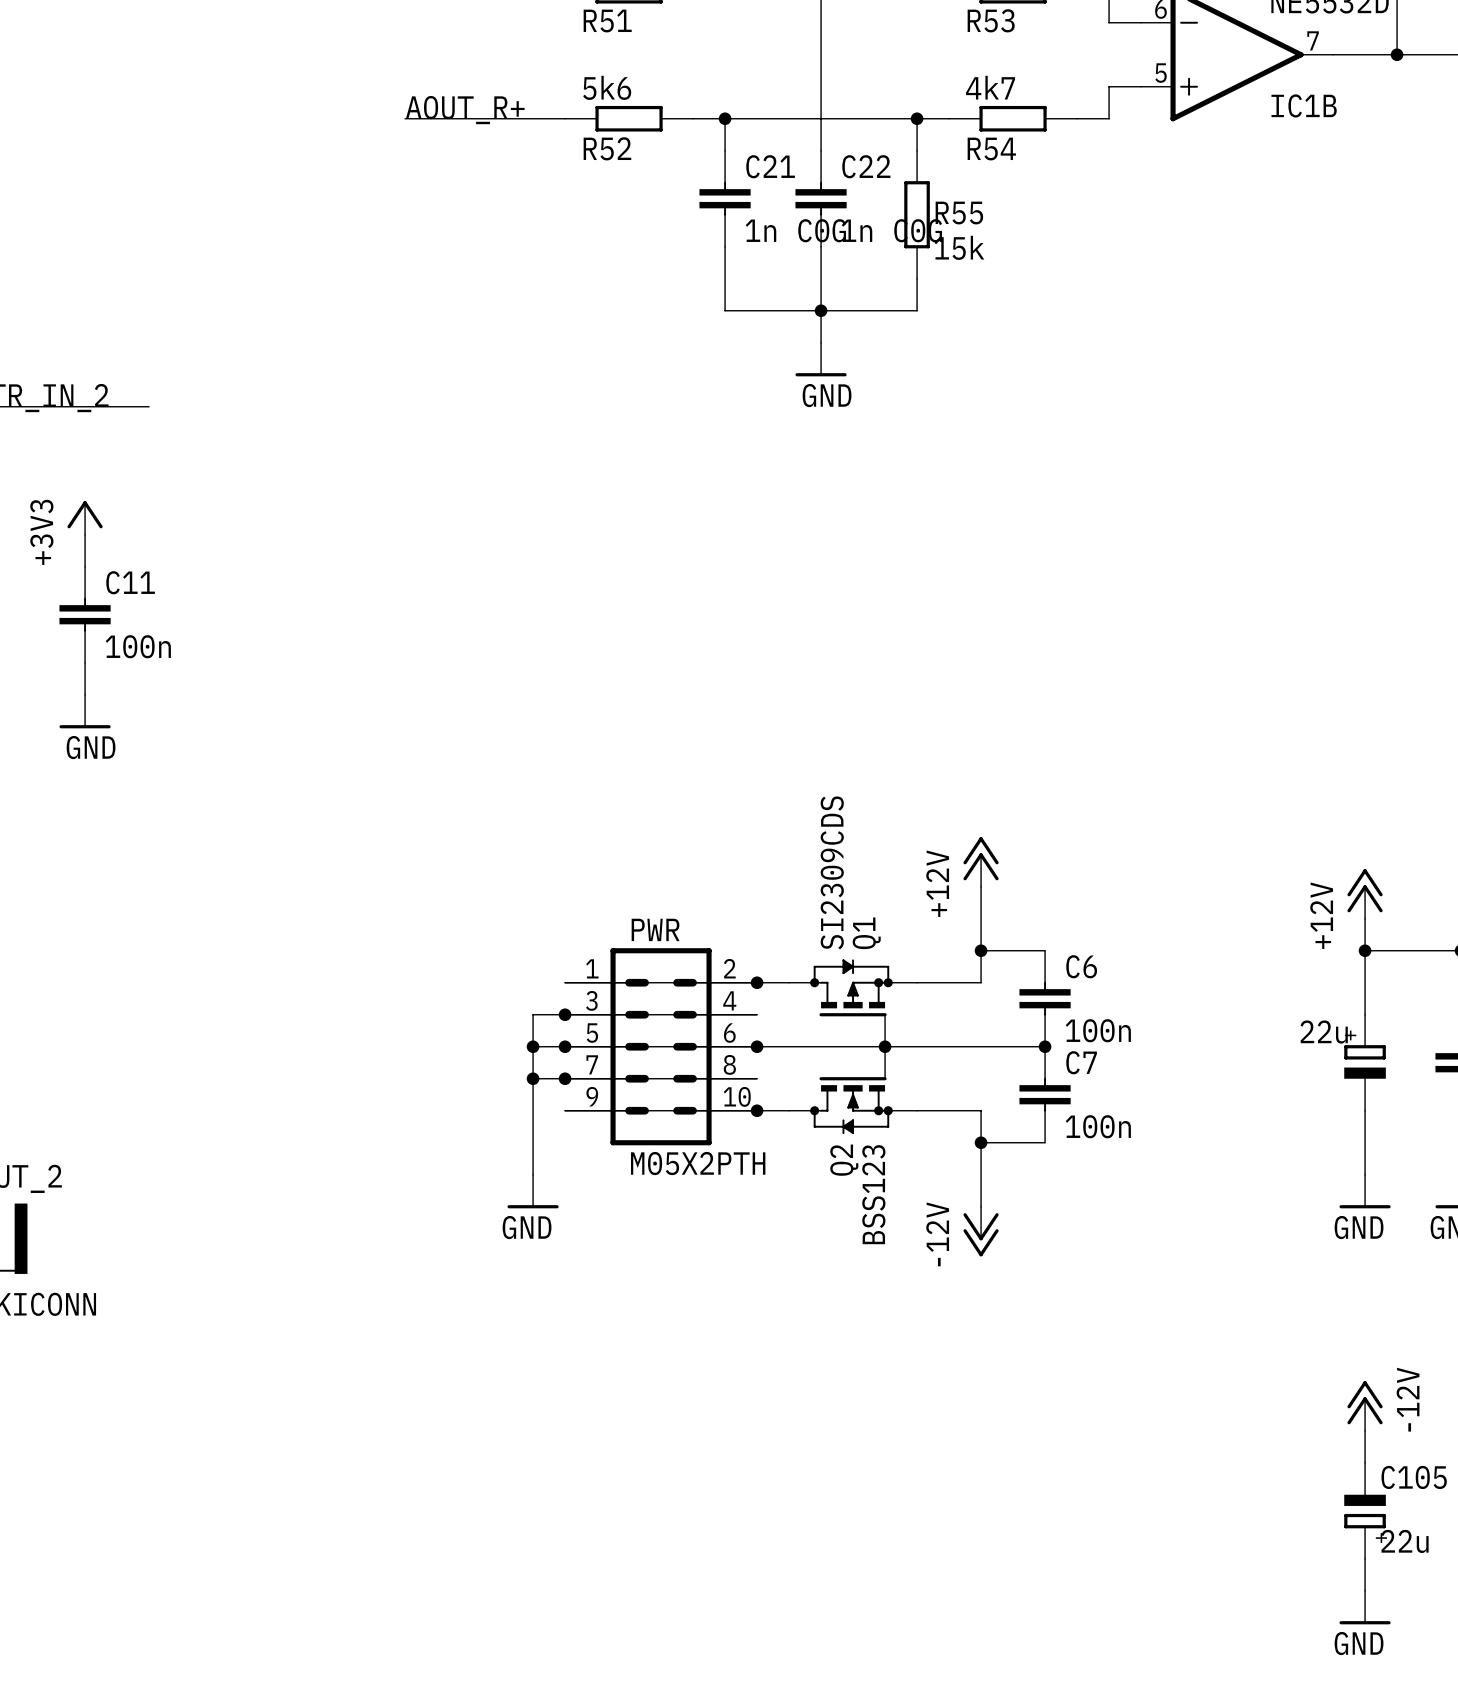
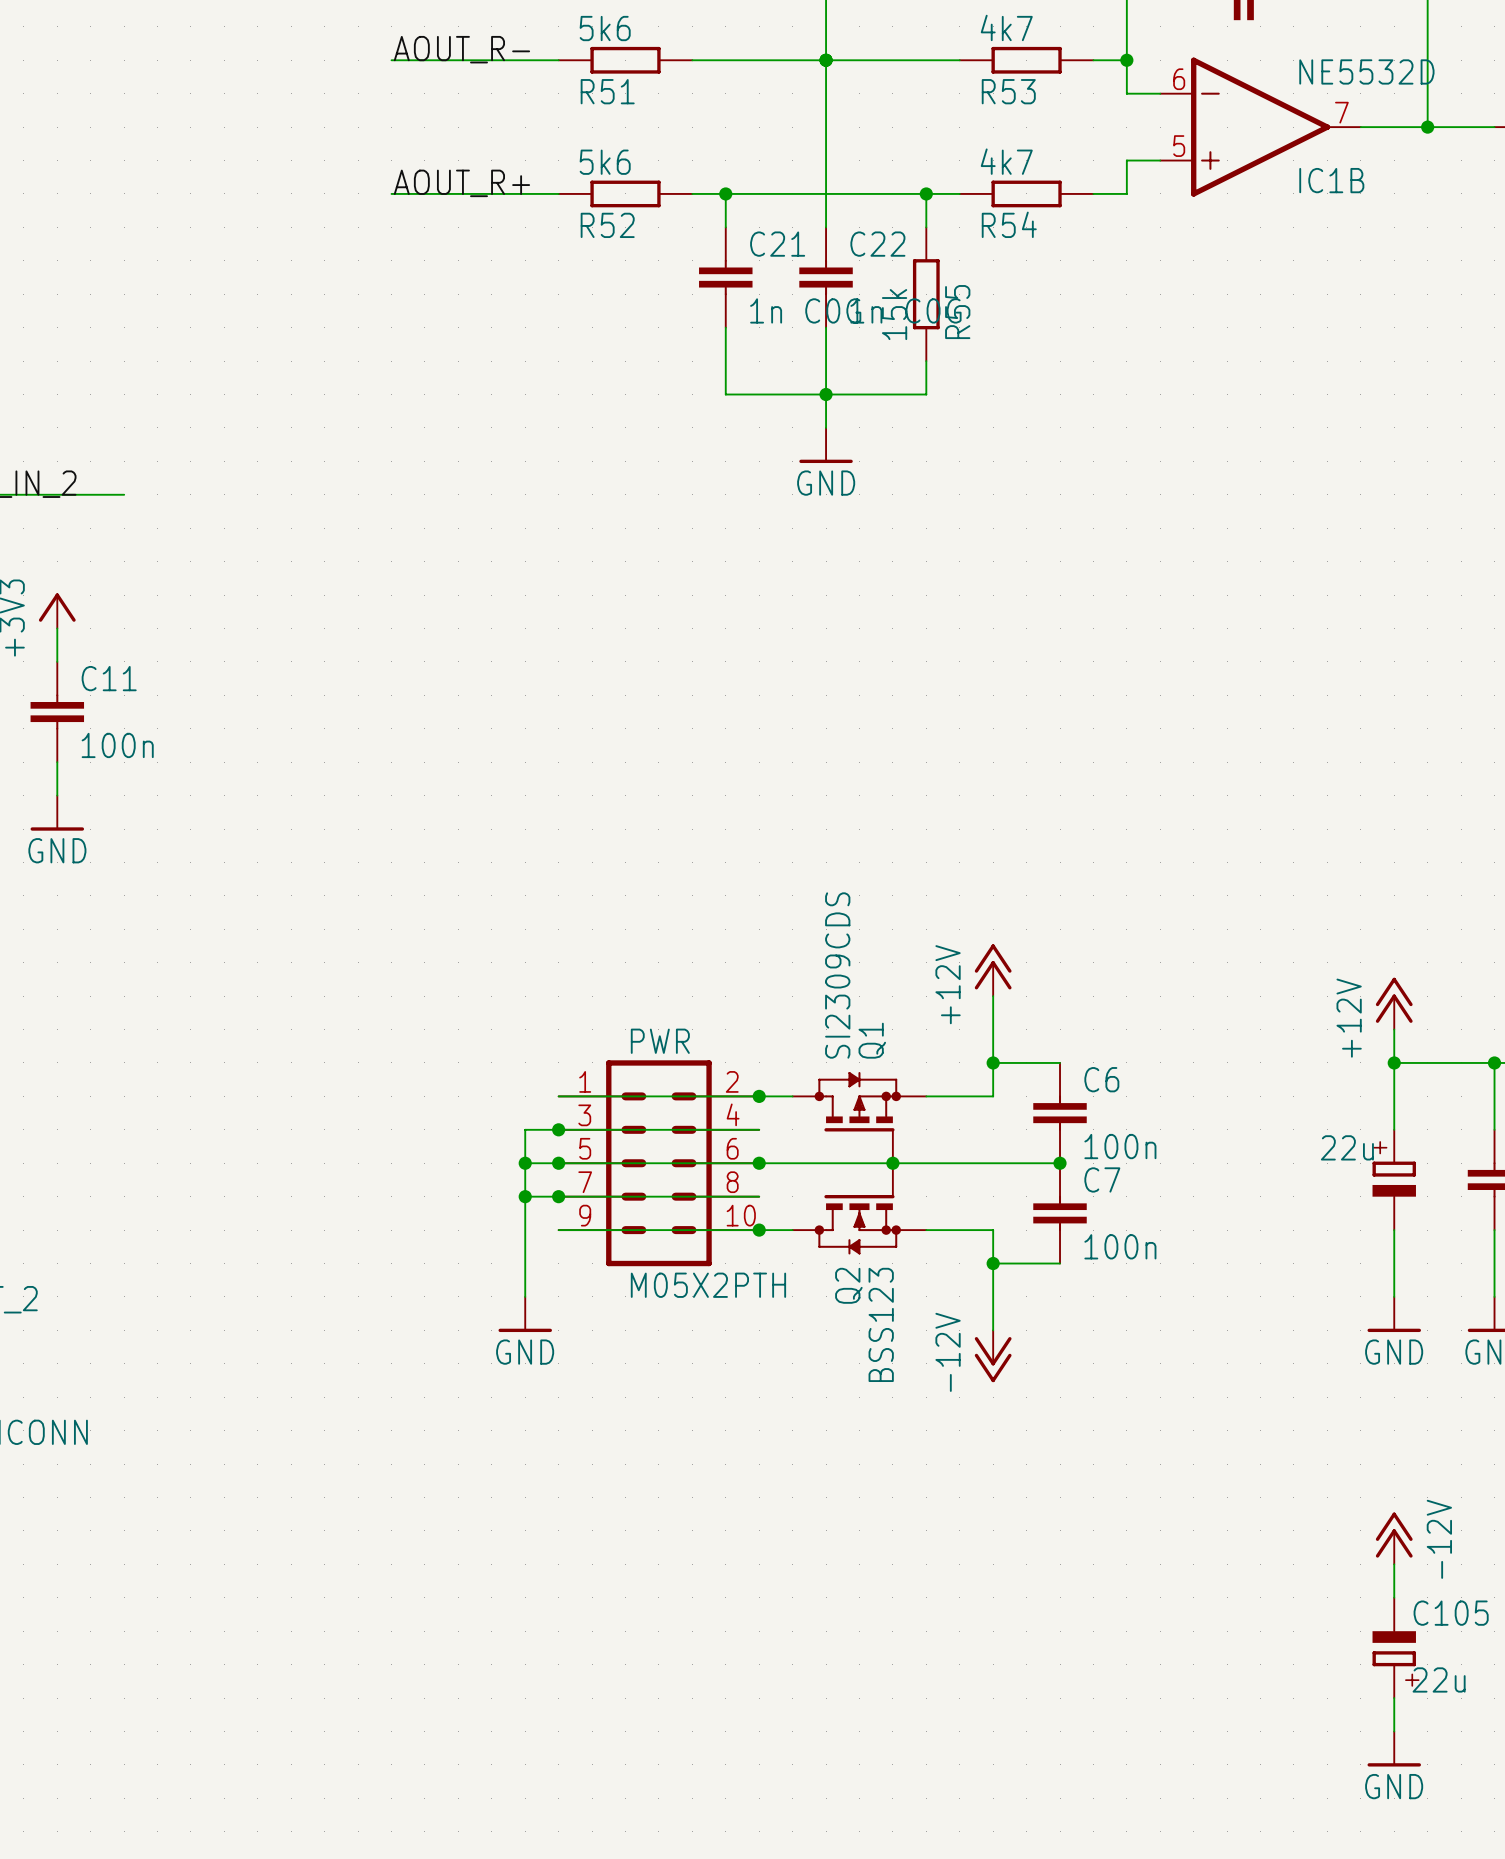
R55 name rotation: 0° (959, 213) -> 90° counterclockwise (957, 312)
R55 value rotation: 0° (959, 247) -> 90° counterclockwise (894, 314)
R55 value position: 15k (959, 247) -> 15k (894, 314)

